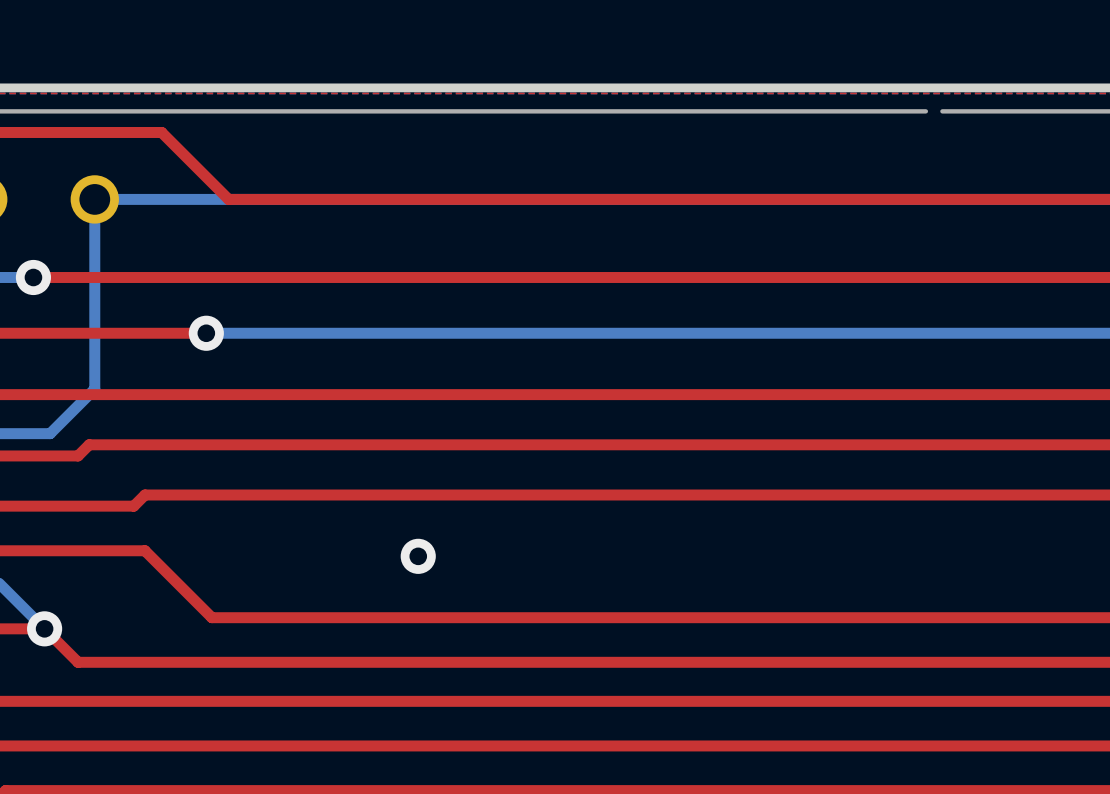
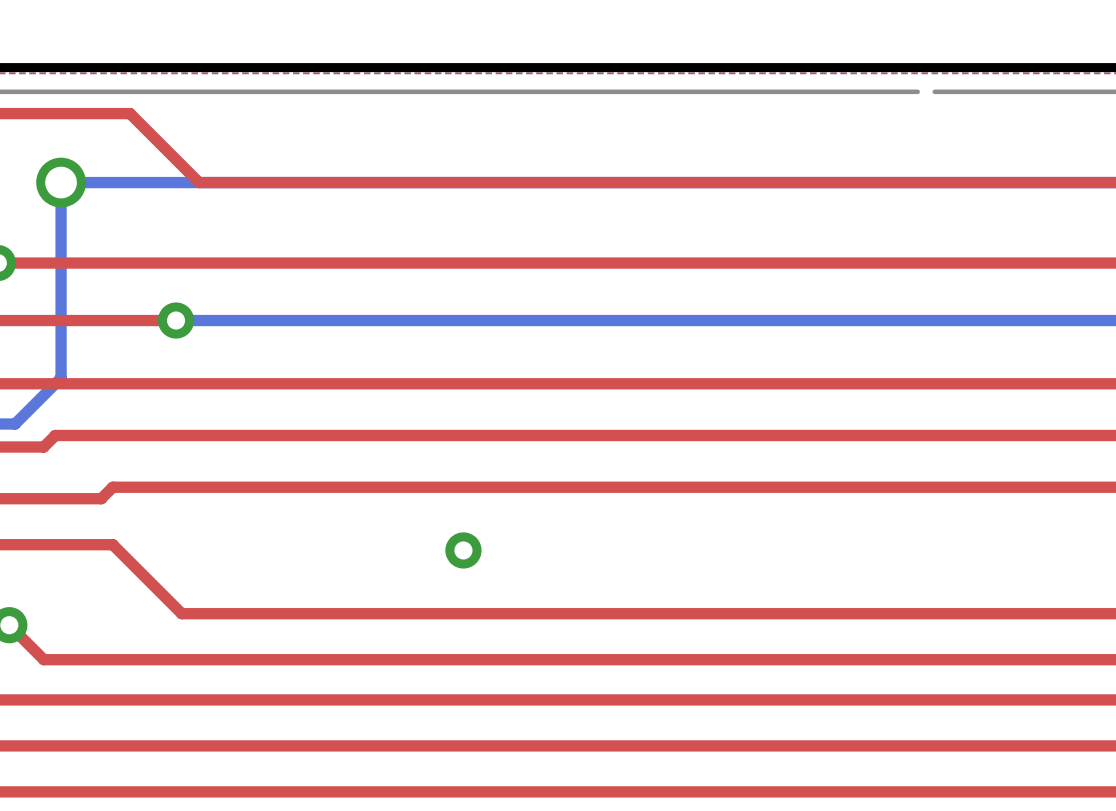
via position: (418, 556) -> (463, 550)

